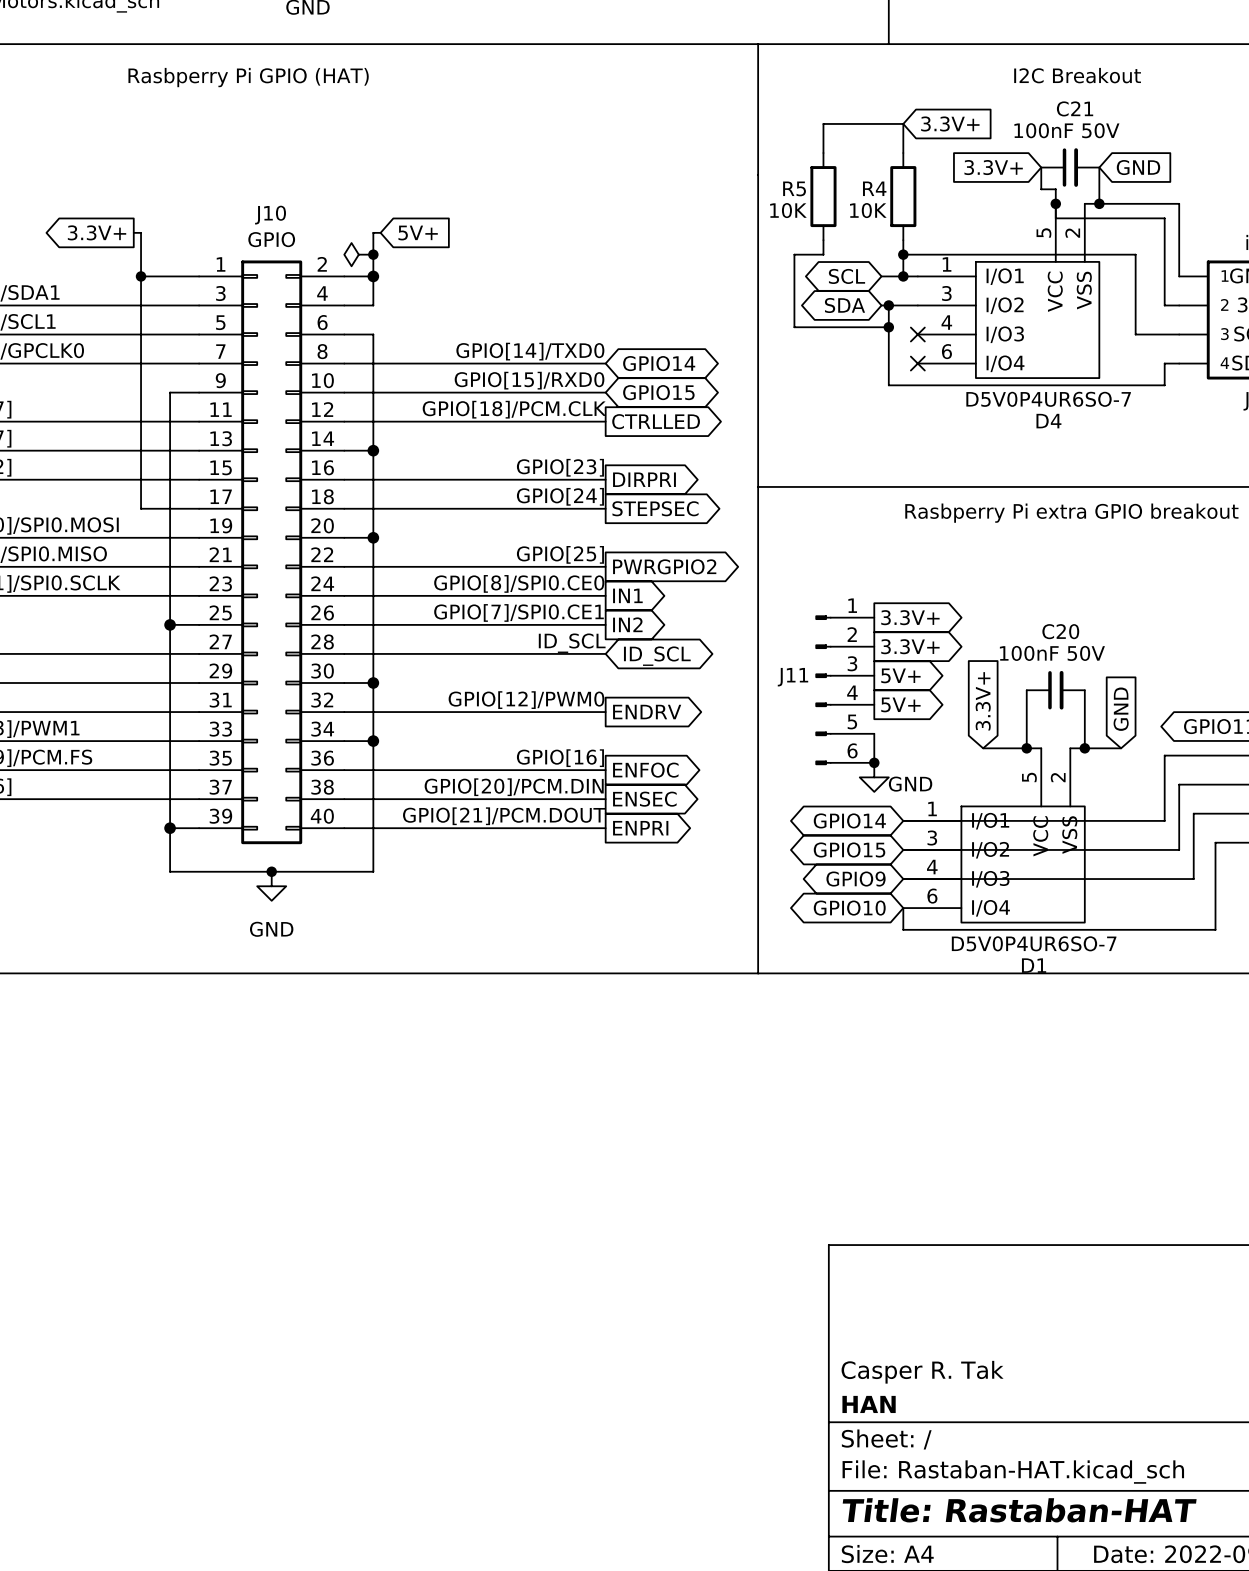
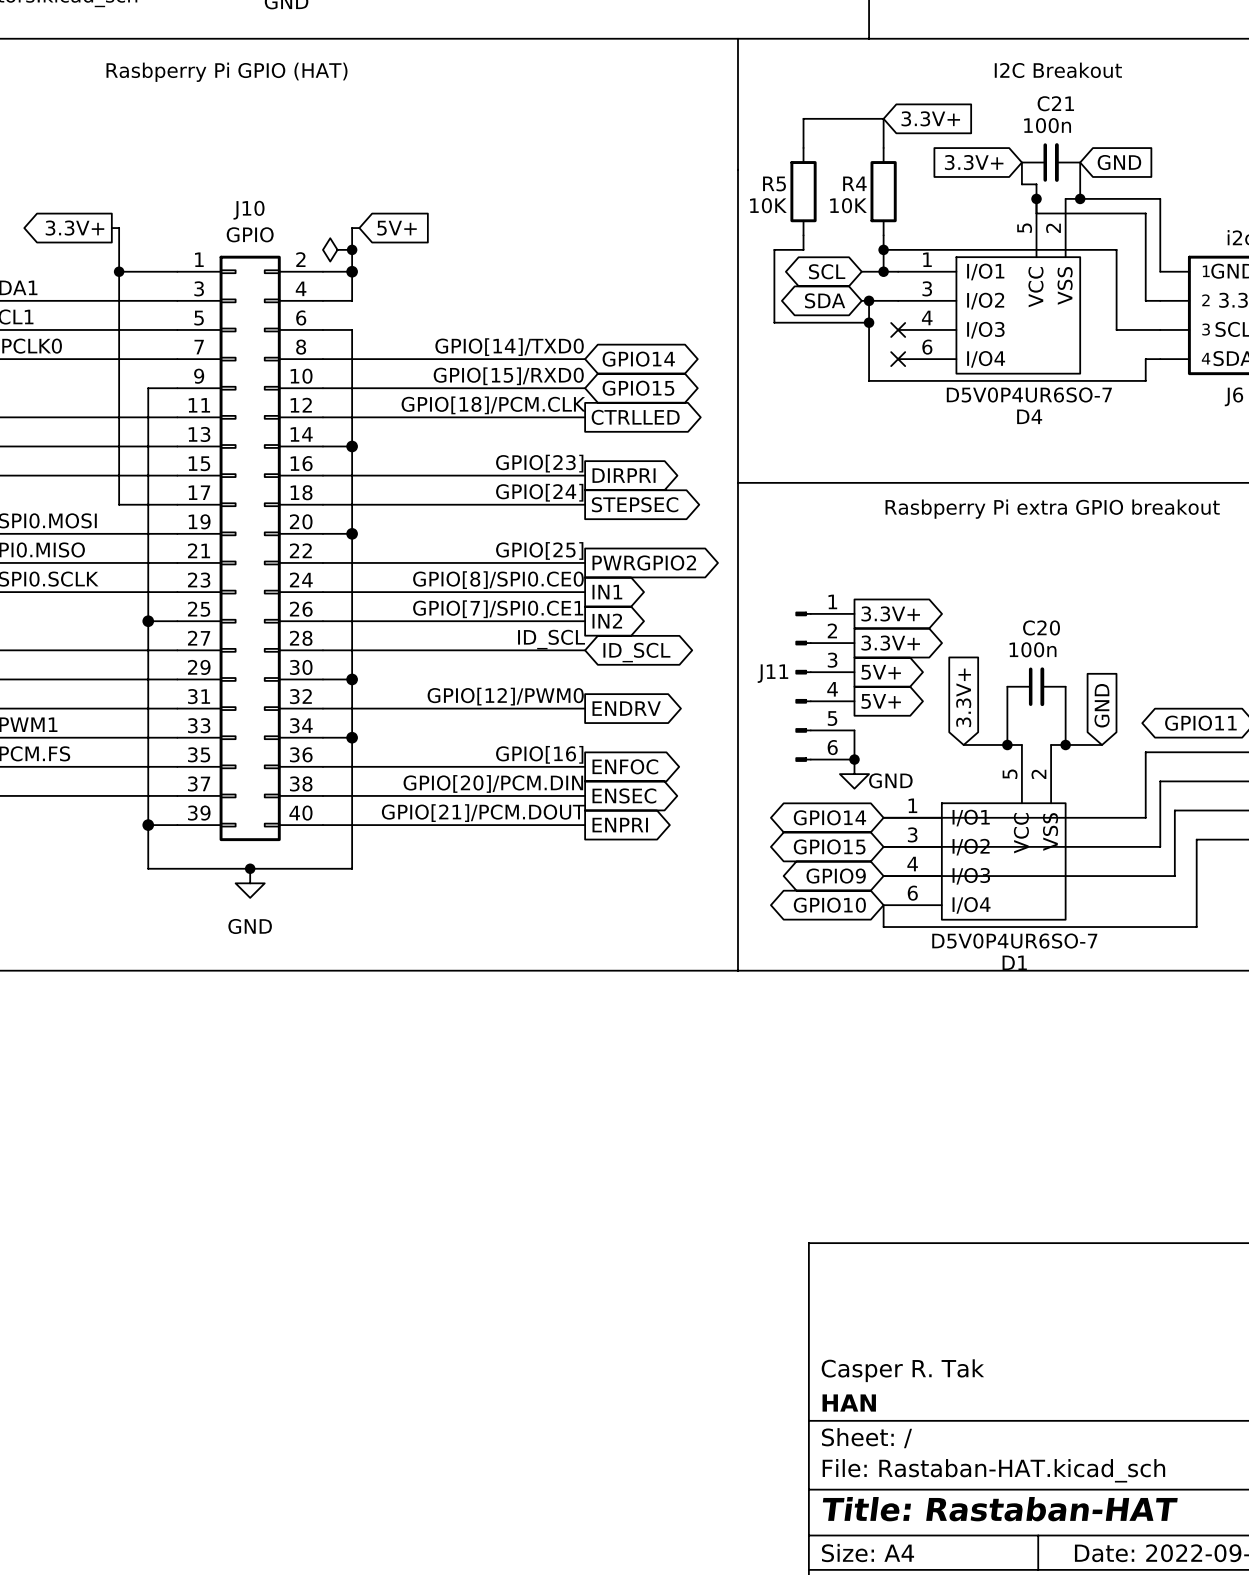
C21 value: 100nF 50V (1066, 130) -> 100n (1047, 125)
C20 value: 100nF 50V (1052, 653) -> 100n (1033, 649)

